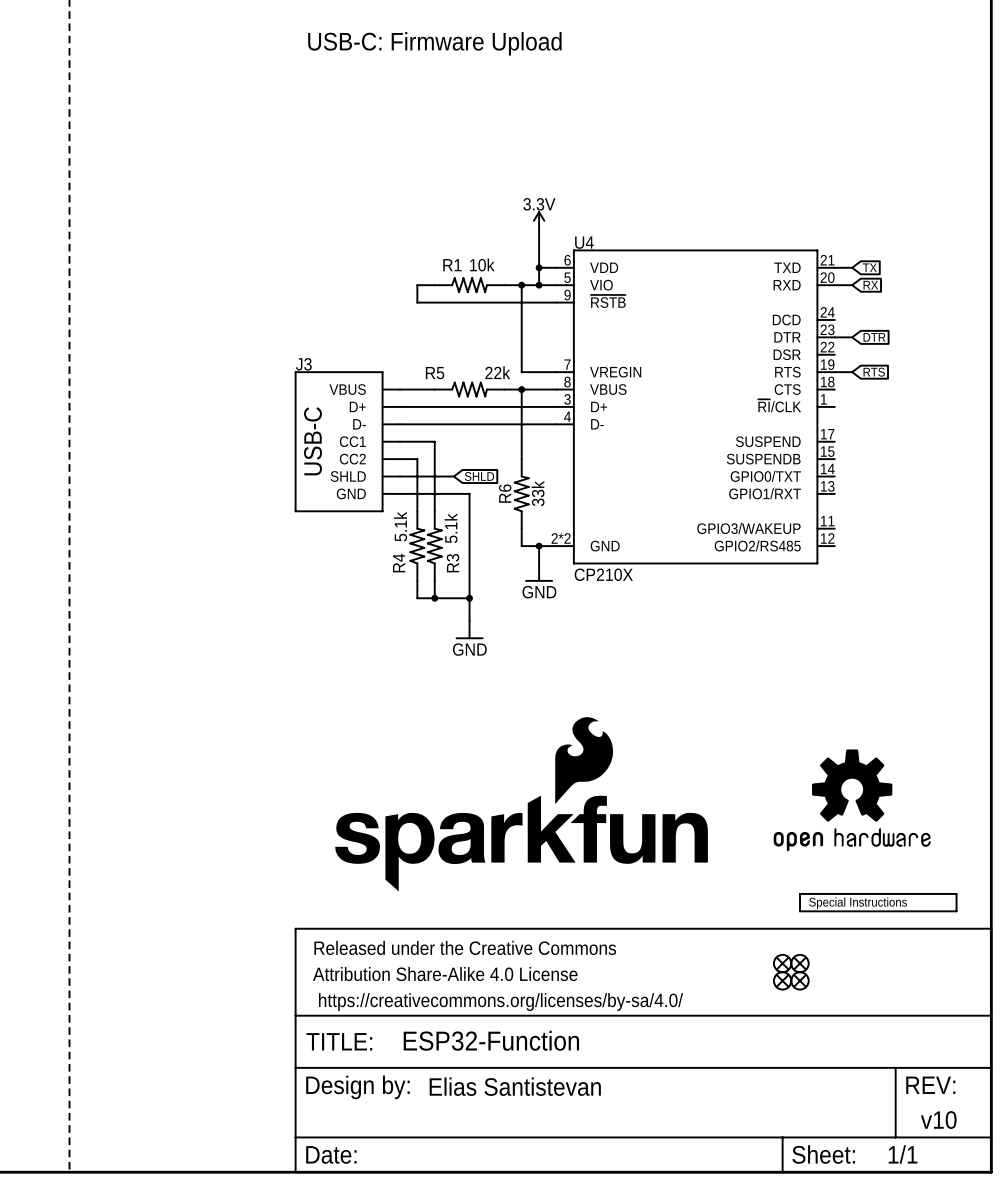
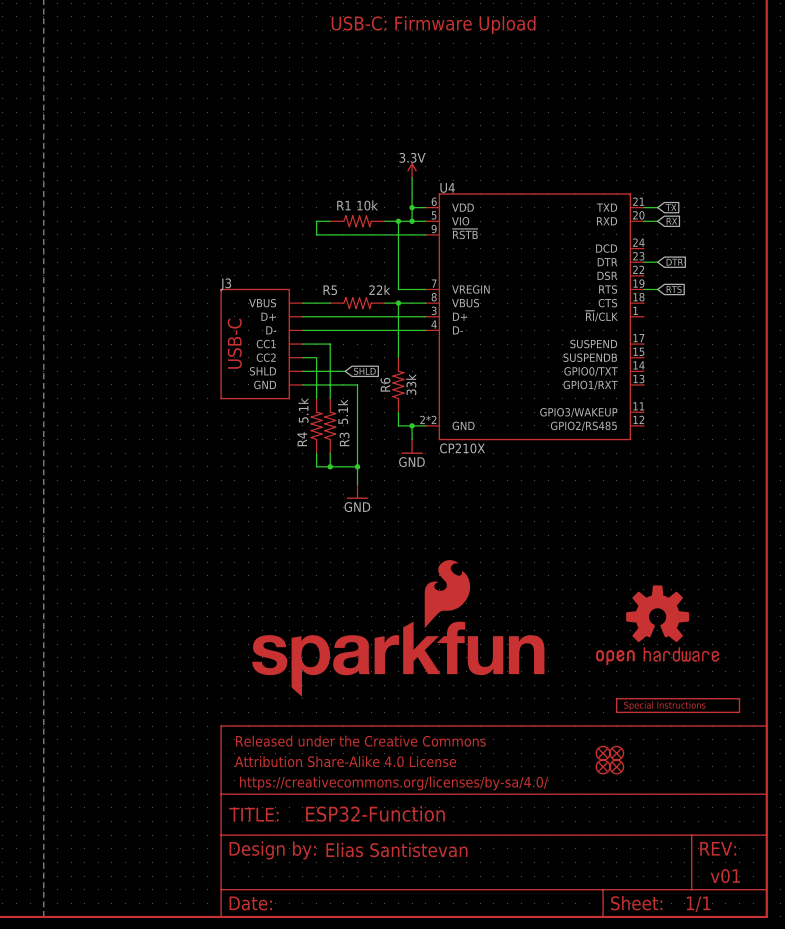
text position: USB-C: Firmware Upload (434, 43) -> USB-C: Firmware Upload (433, 25)
text: v10 (938, 1120) -> v01 (725, 876)

